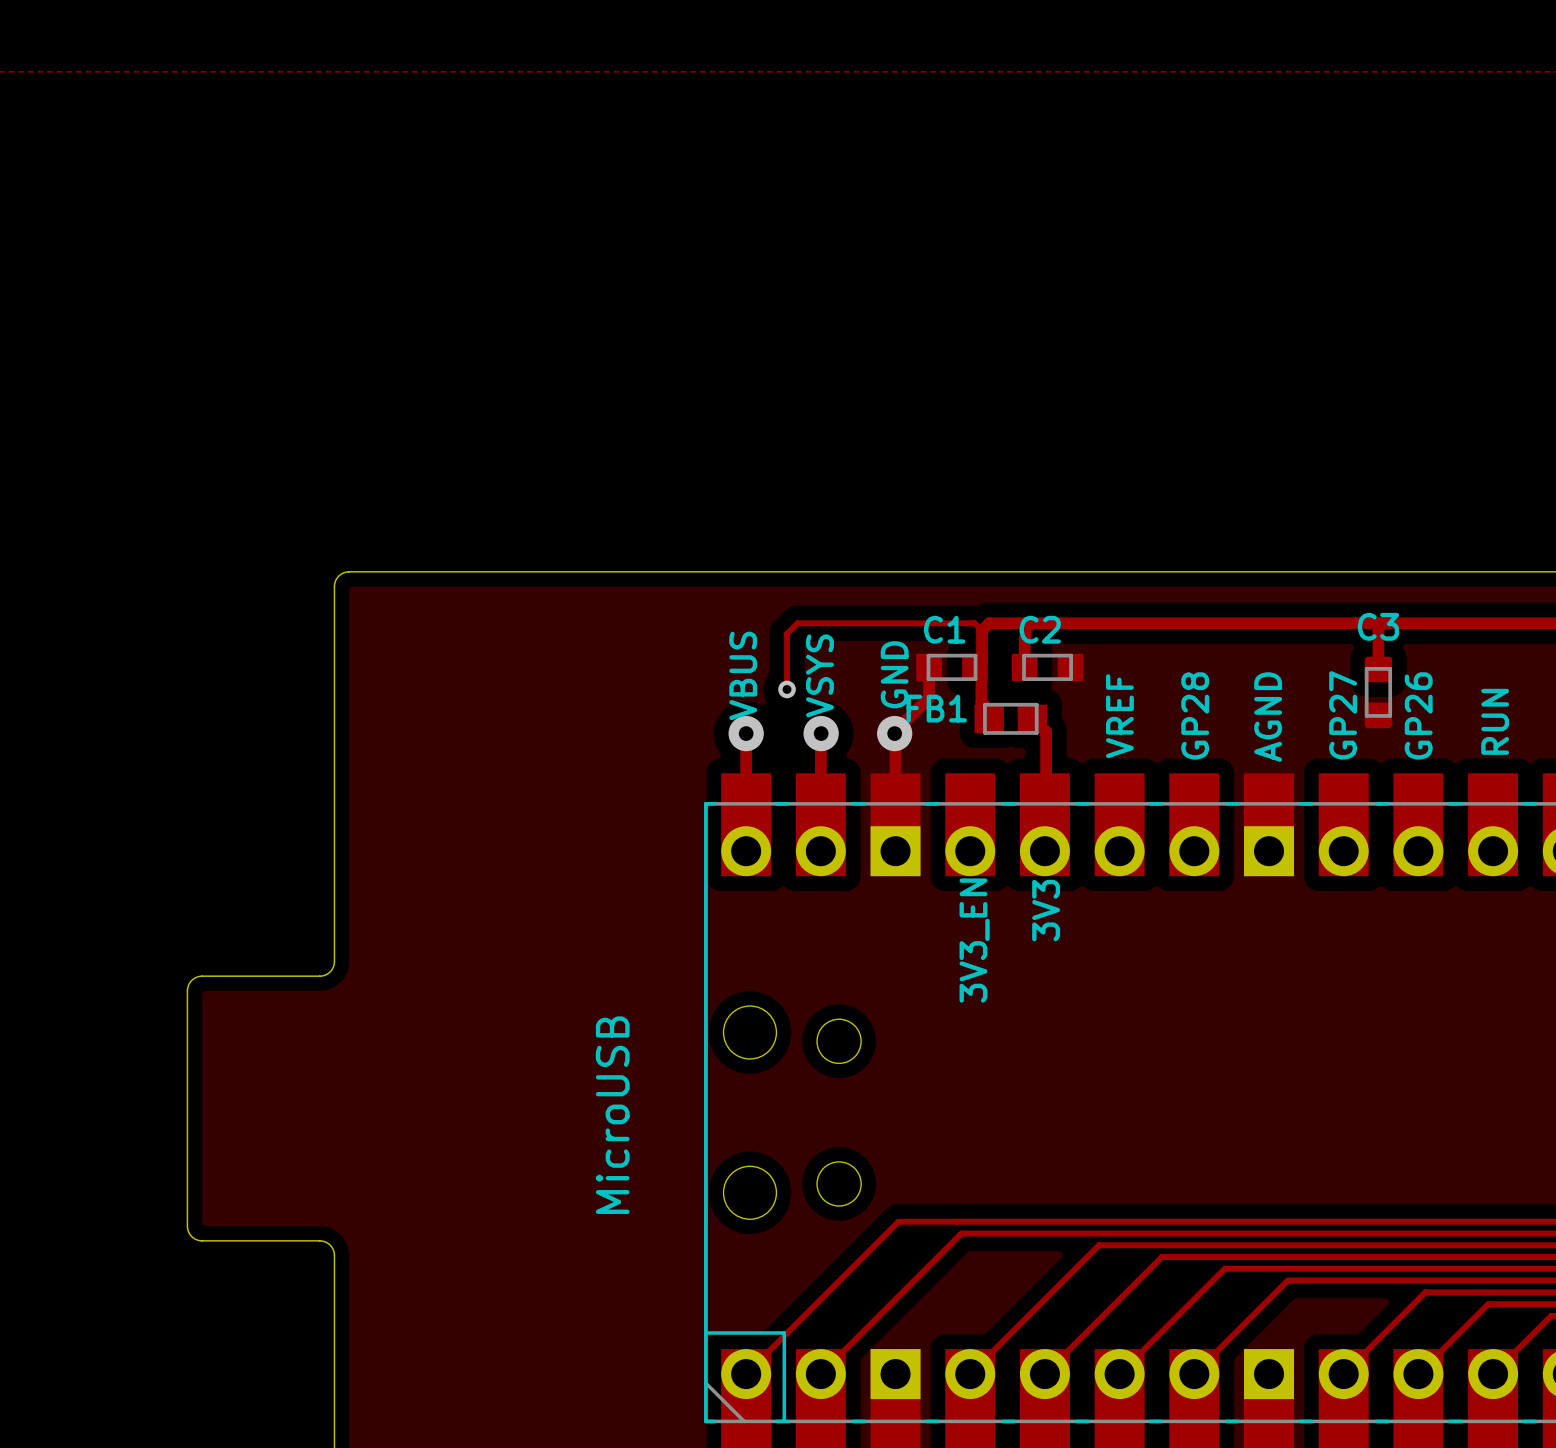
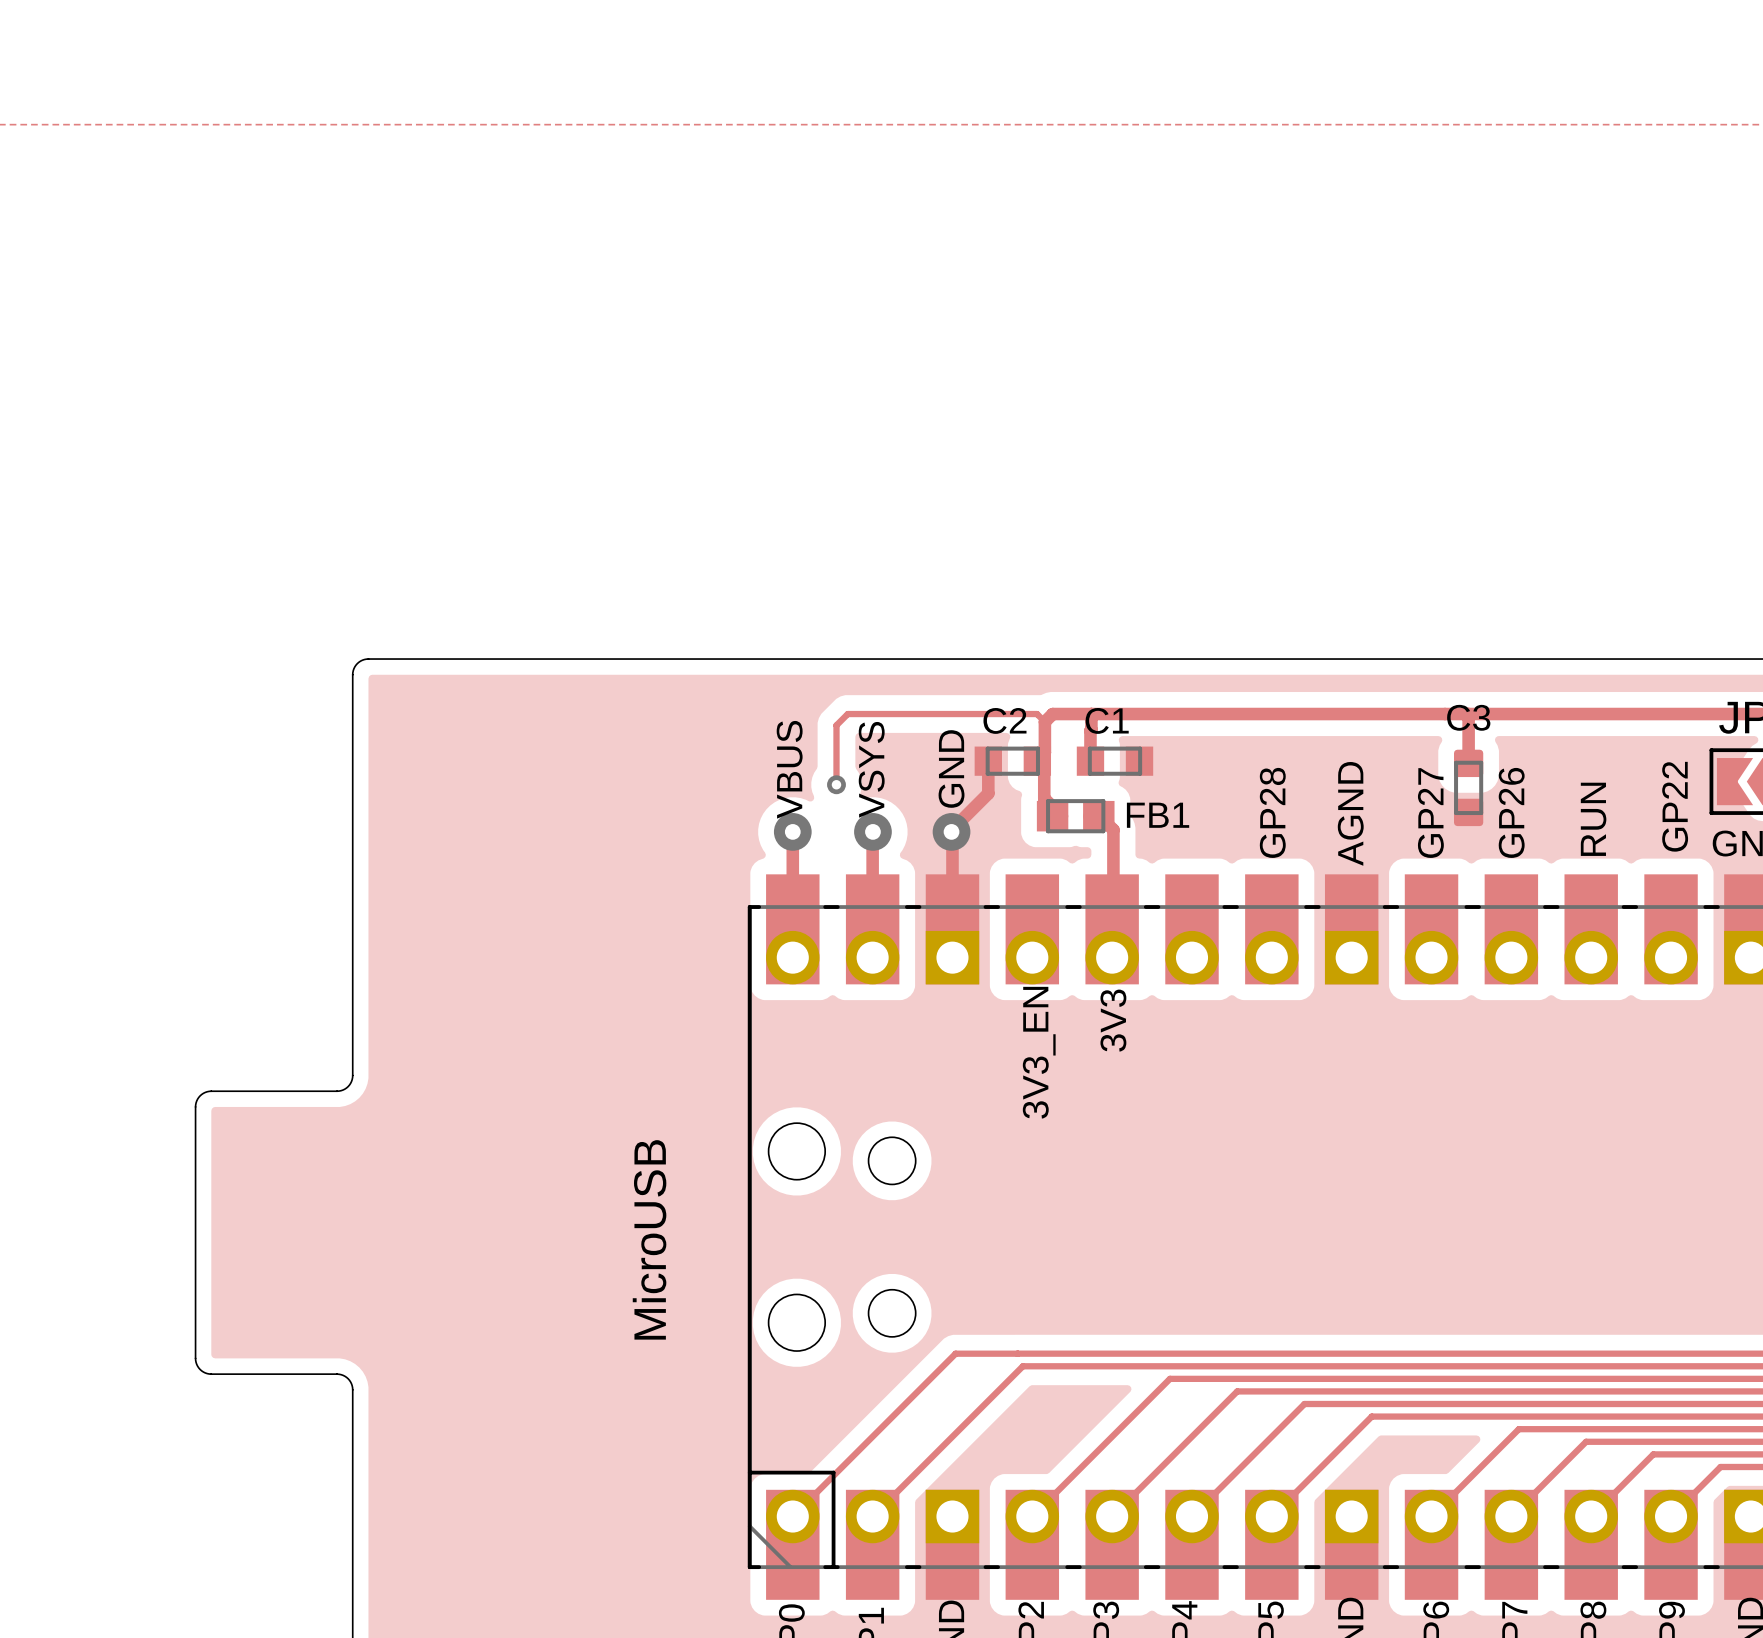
C1 name: C1 (944, 629) -> C2 (1004, 720)
C2 name: C2 (1040, 629) -> C1 (1107, 720)
FB1 name position: FB1 (936, 708) -> FB1 (1158, 815)
text: VREF (1119, 716) -> none

